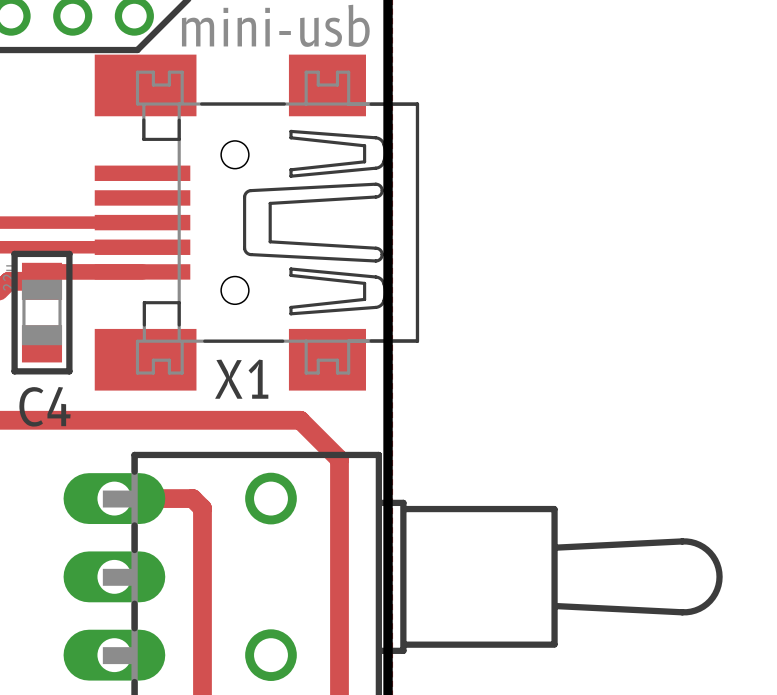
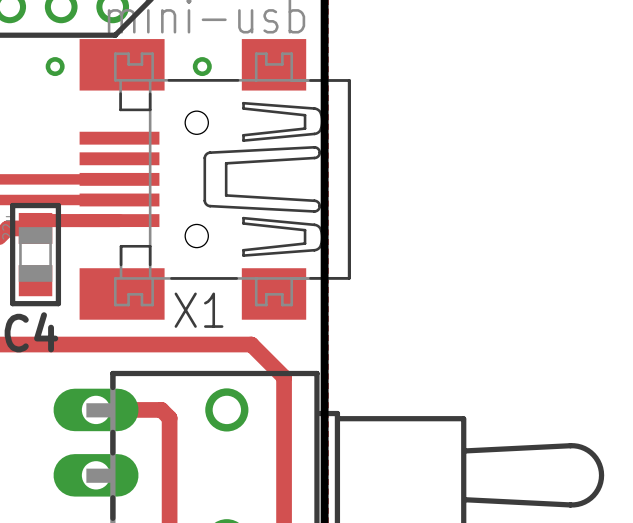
via: none -> (55, 66)
via: none -> (202, 66)

